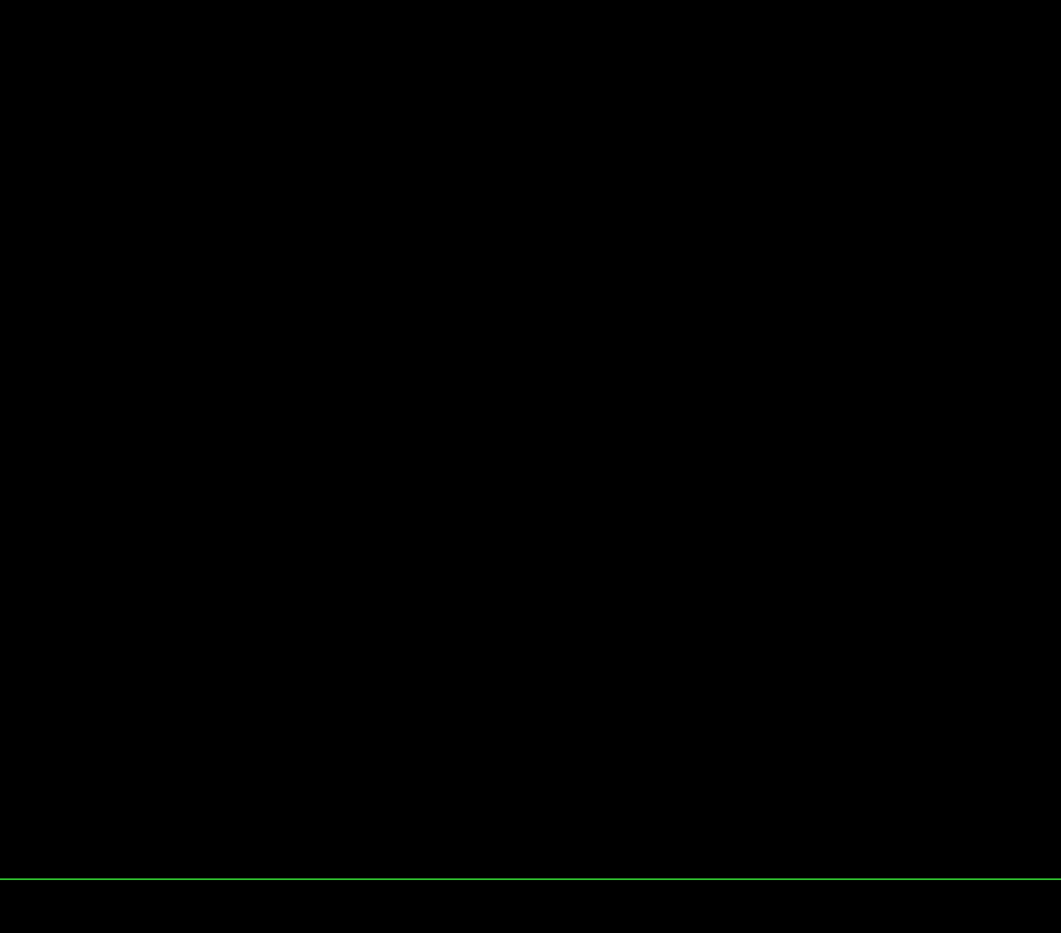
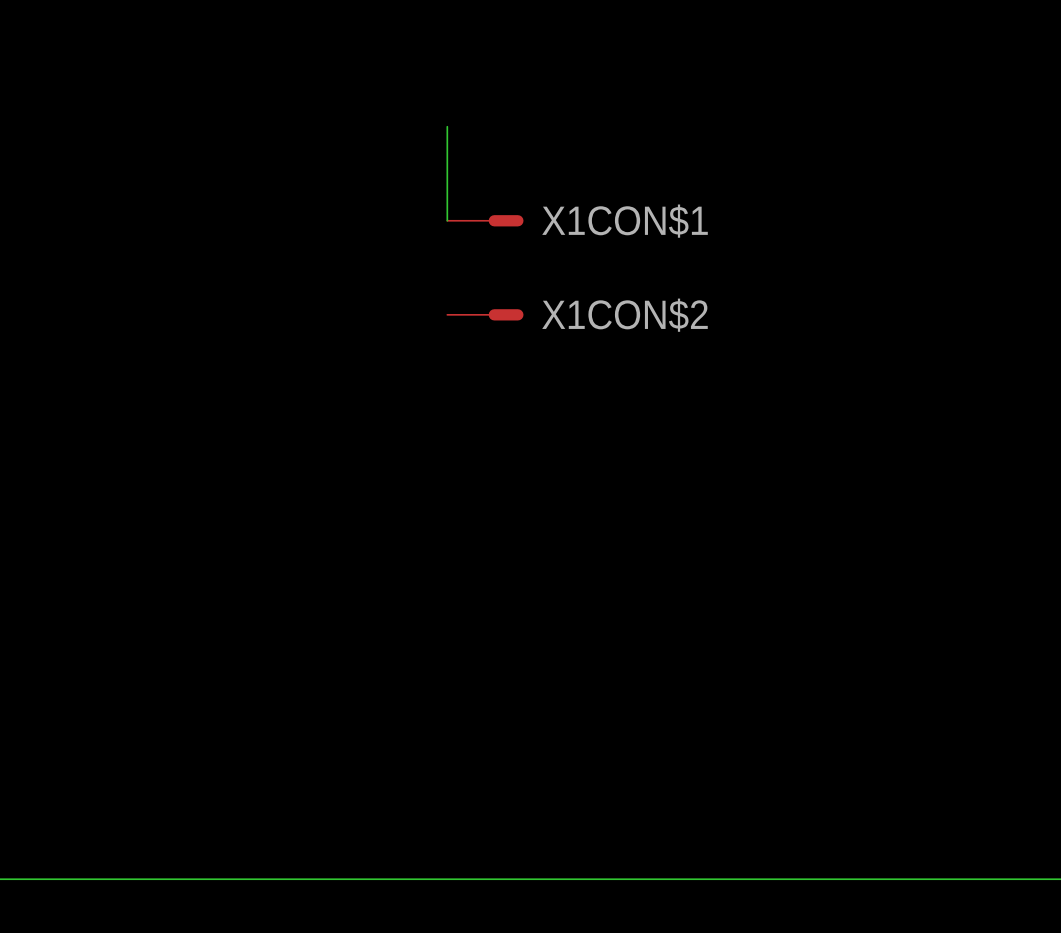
wire: none -> (447, 126) (447, 220)
X1CON$1: none -> (485, 220)
X1CON$2: none -> (485, 314)

